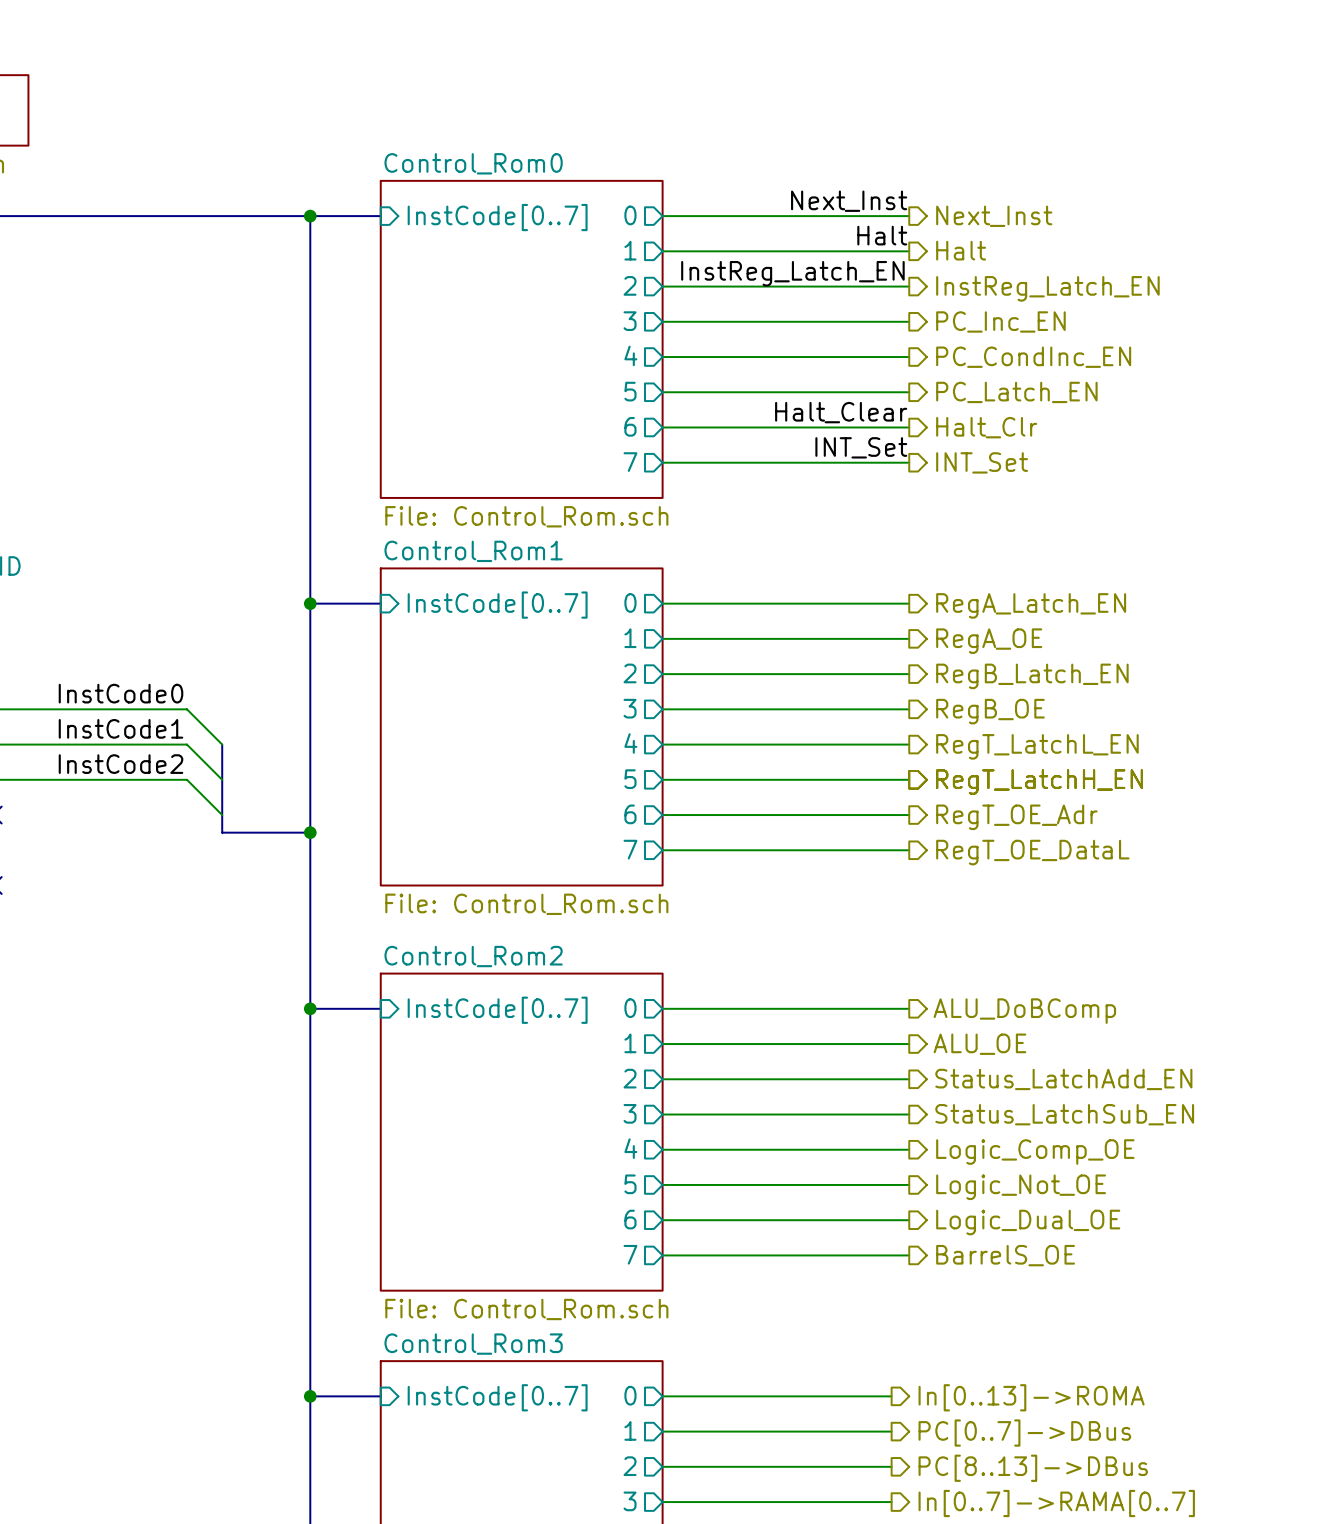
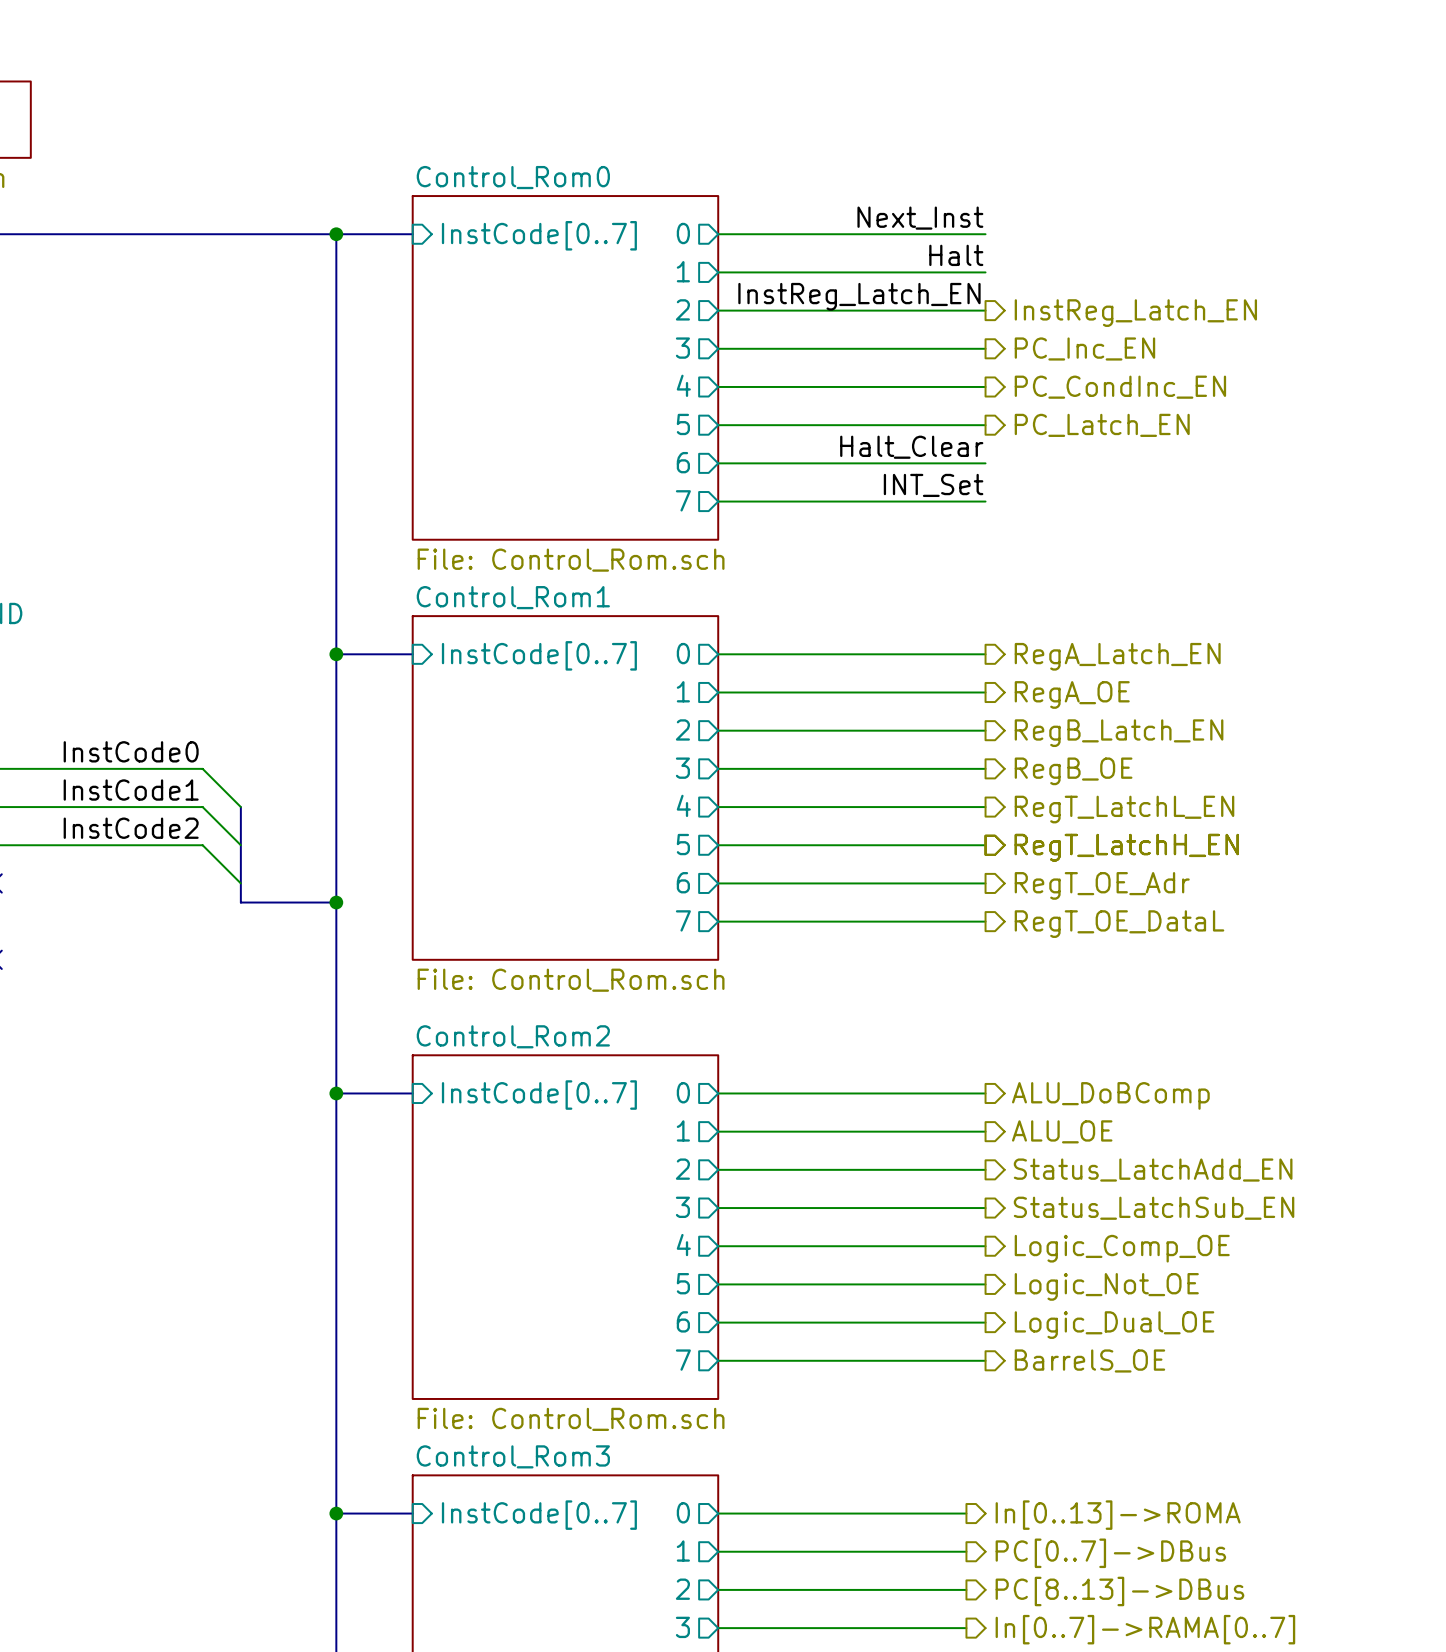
hierarchical label: Next_Inst (994, 216) -> none
hierarchical label: Halt (961, 250) -> none
hierarchical label: Halt_Clr (986, 427) -> none
hierarchical label: INT_Set (982, 462) -> none

